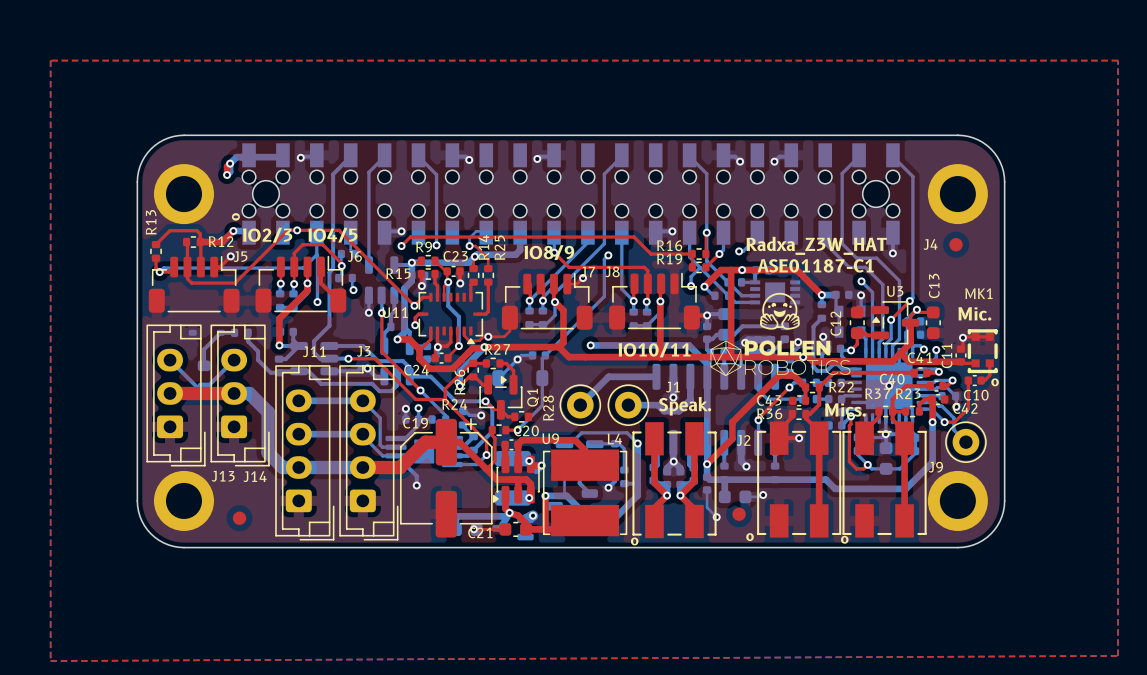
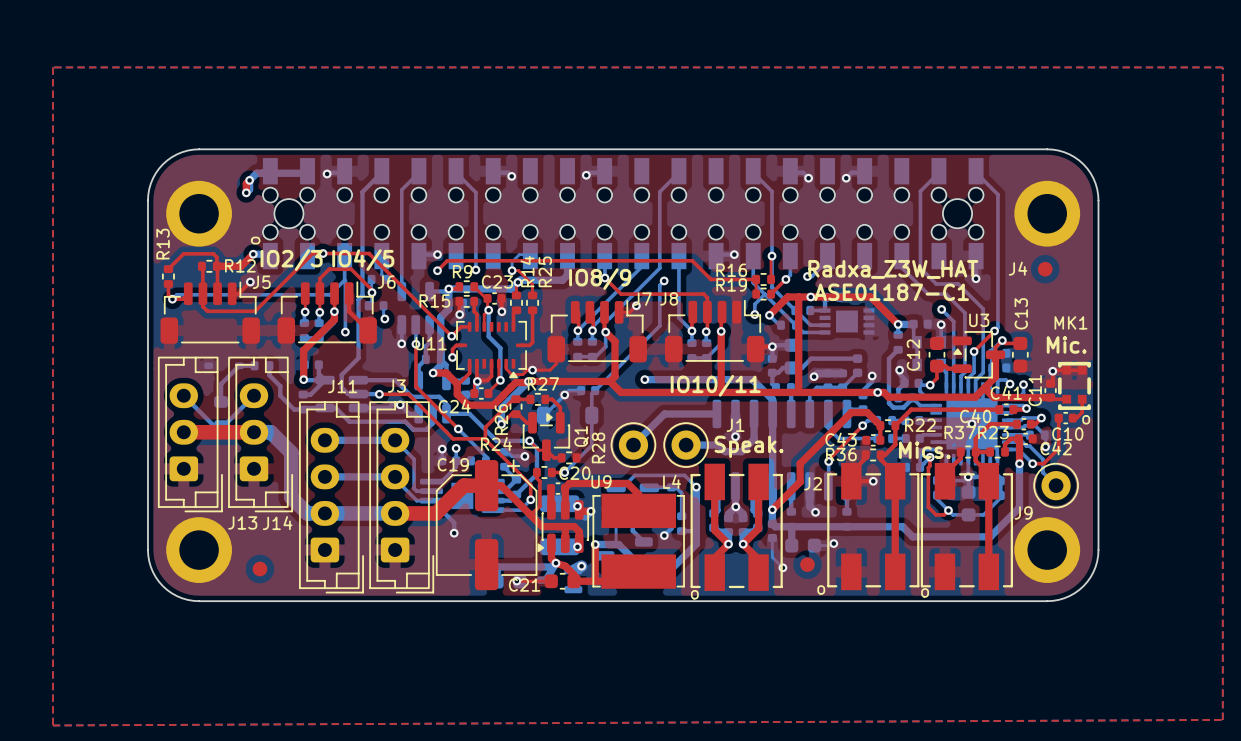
drawing: [710, 292, 851, 377] -> none

